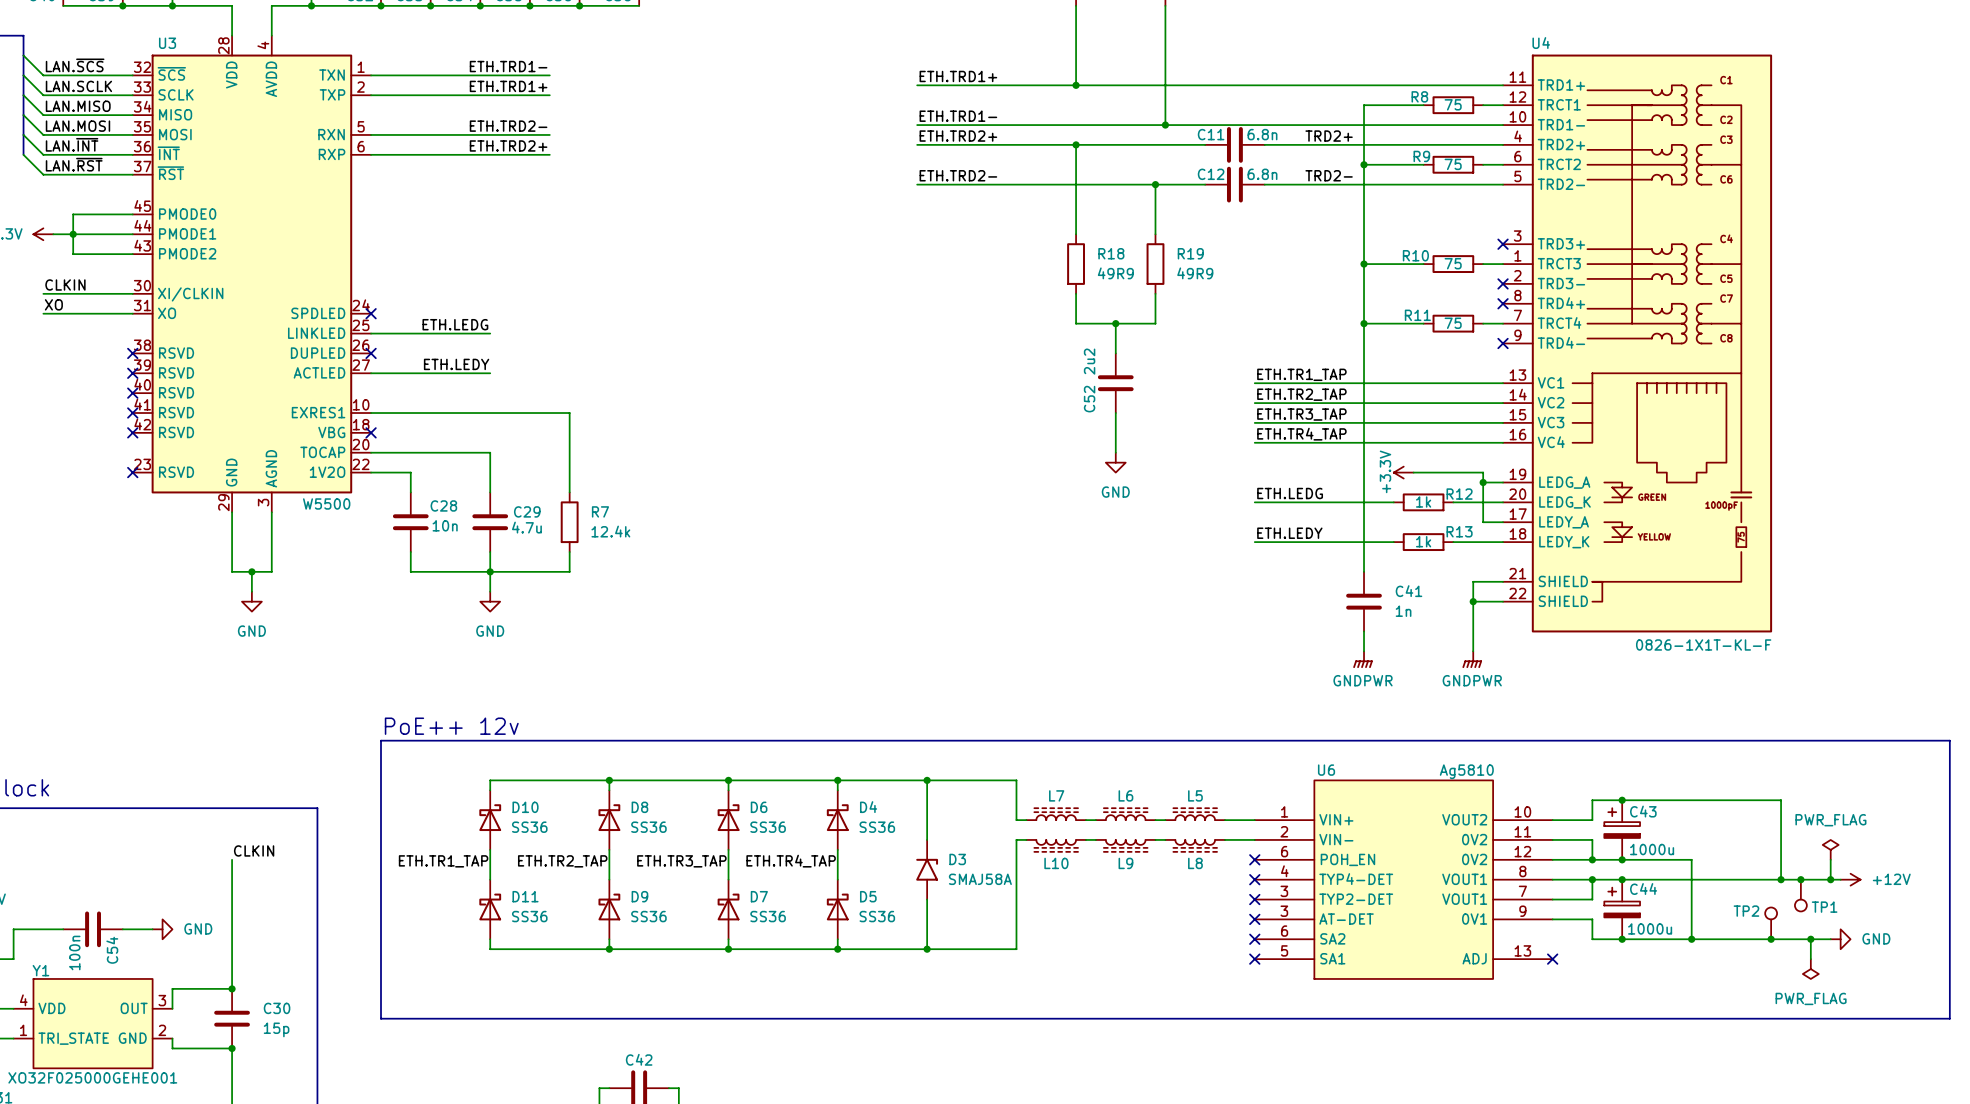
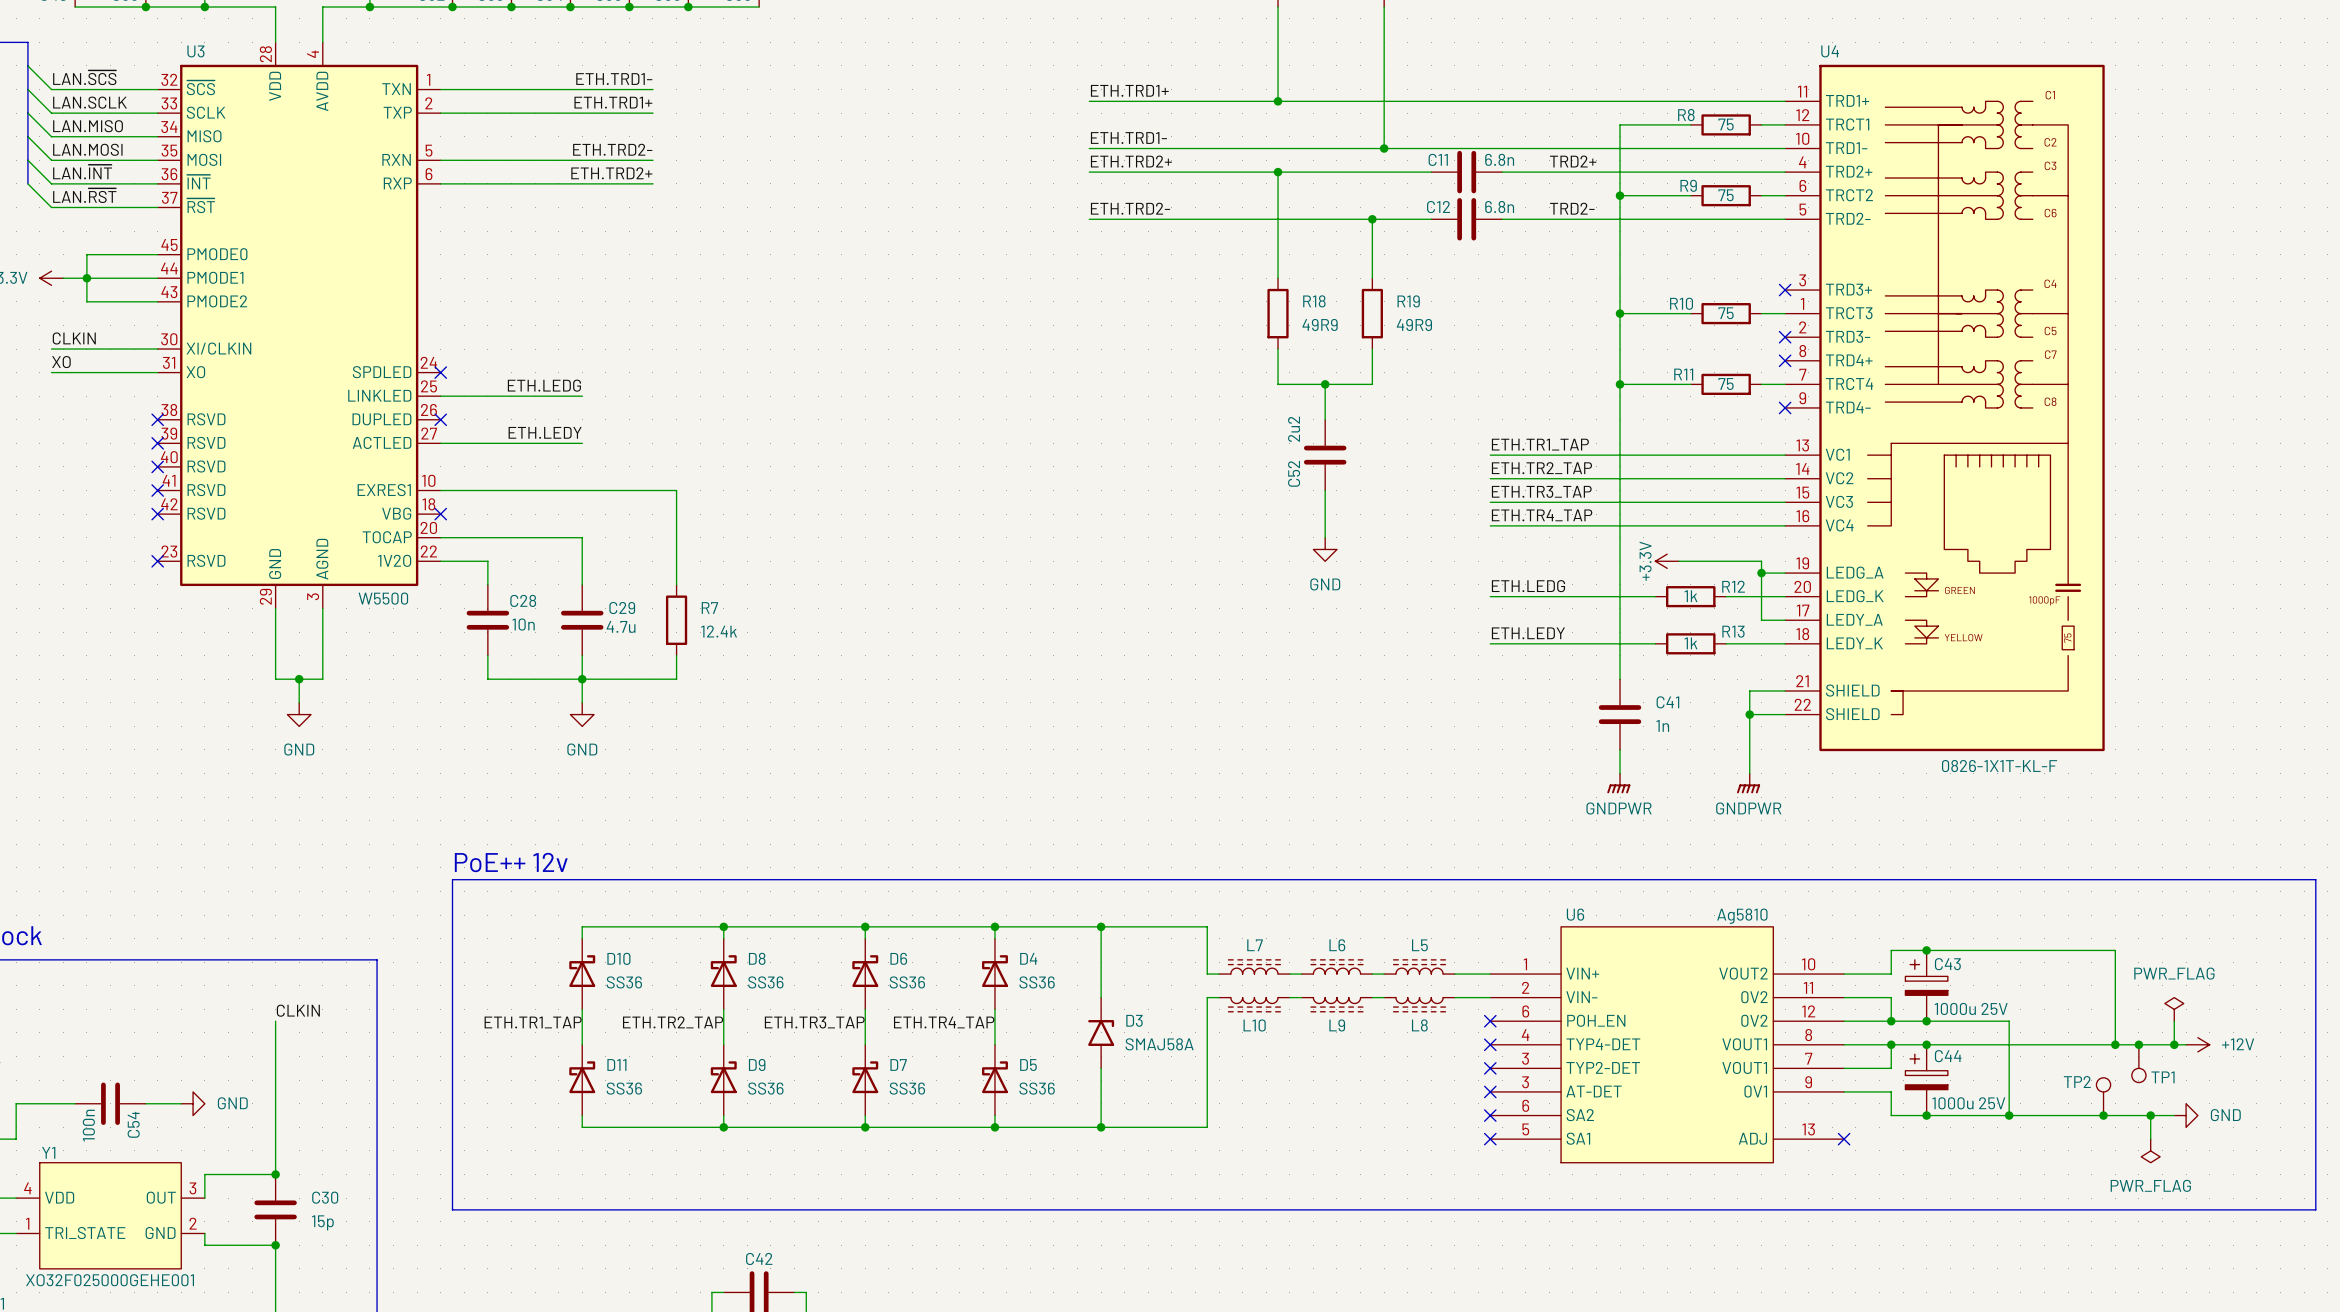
C43 value: 1000u (1652, 849) -> 1000u 25V (1971, 1008)
C44 value: 1000u (1650, 928) -> 1000u 25V (1968, 1103)

